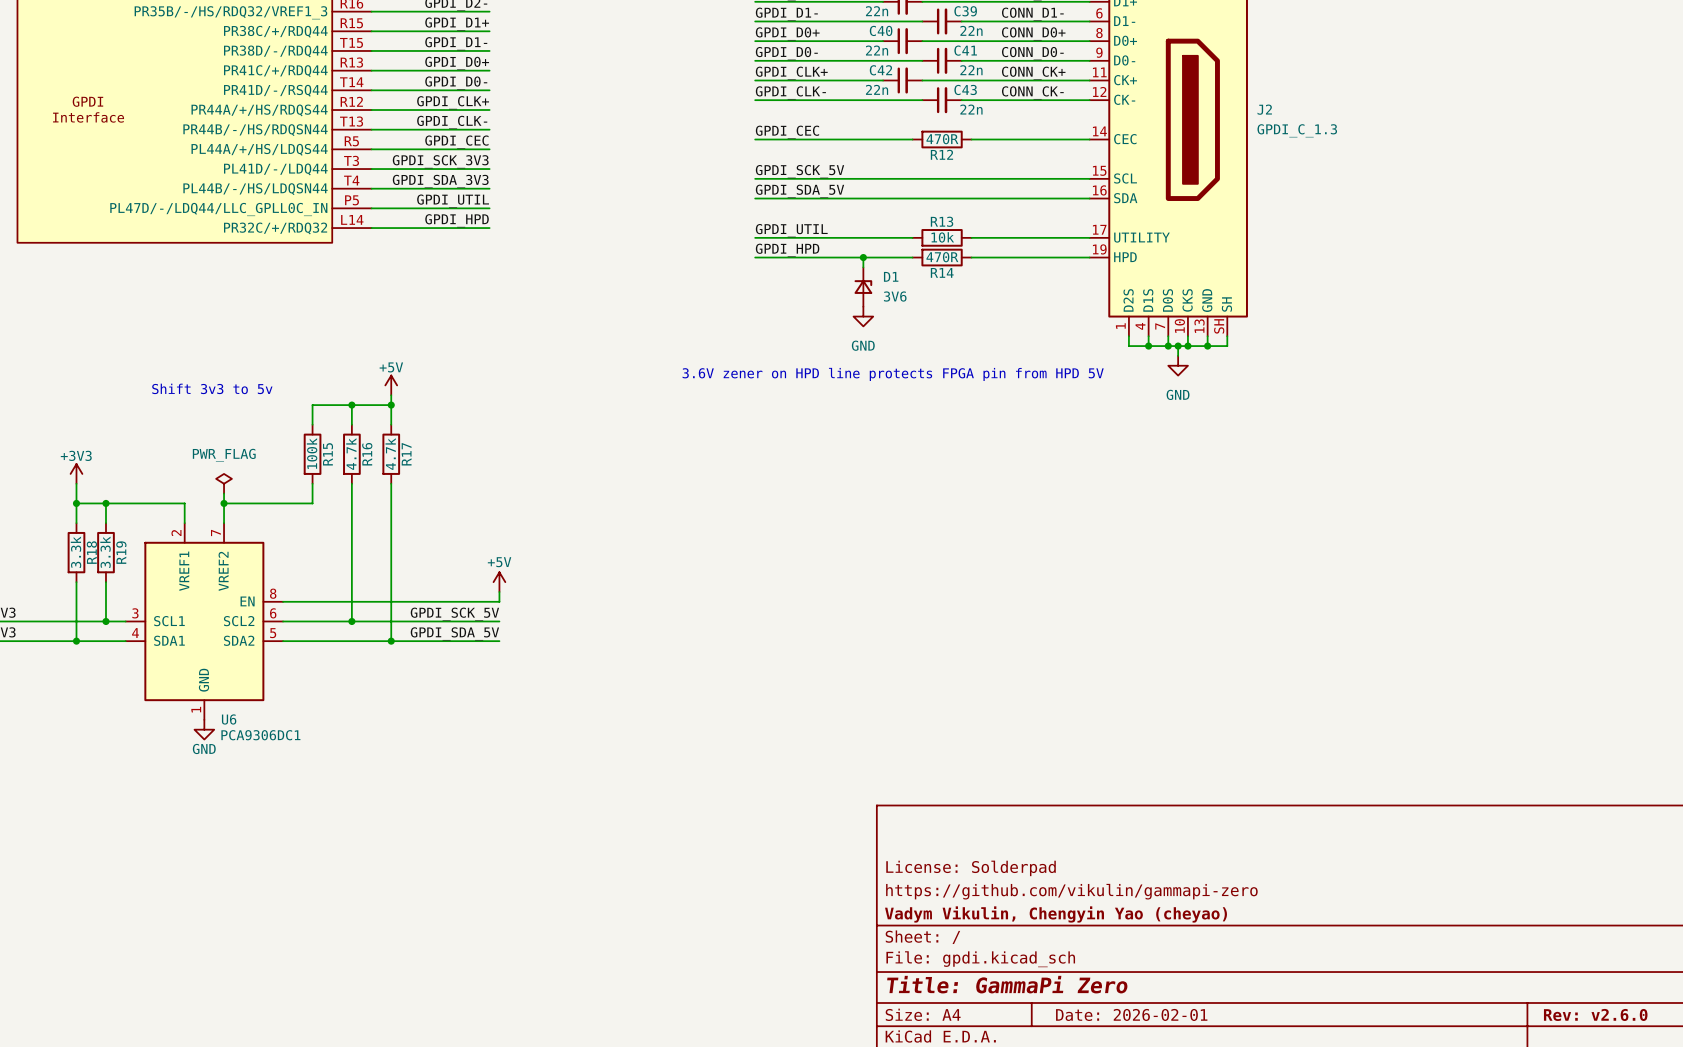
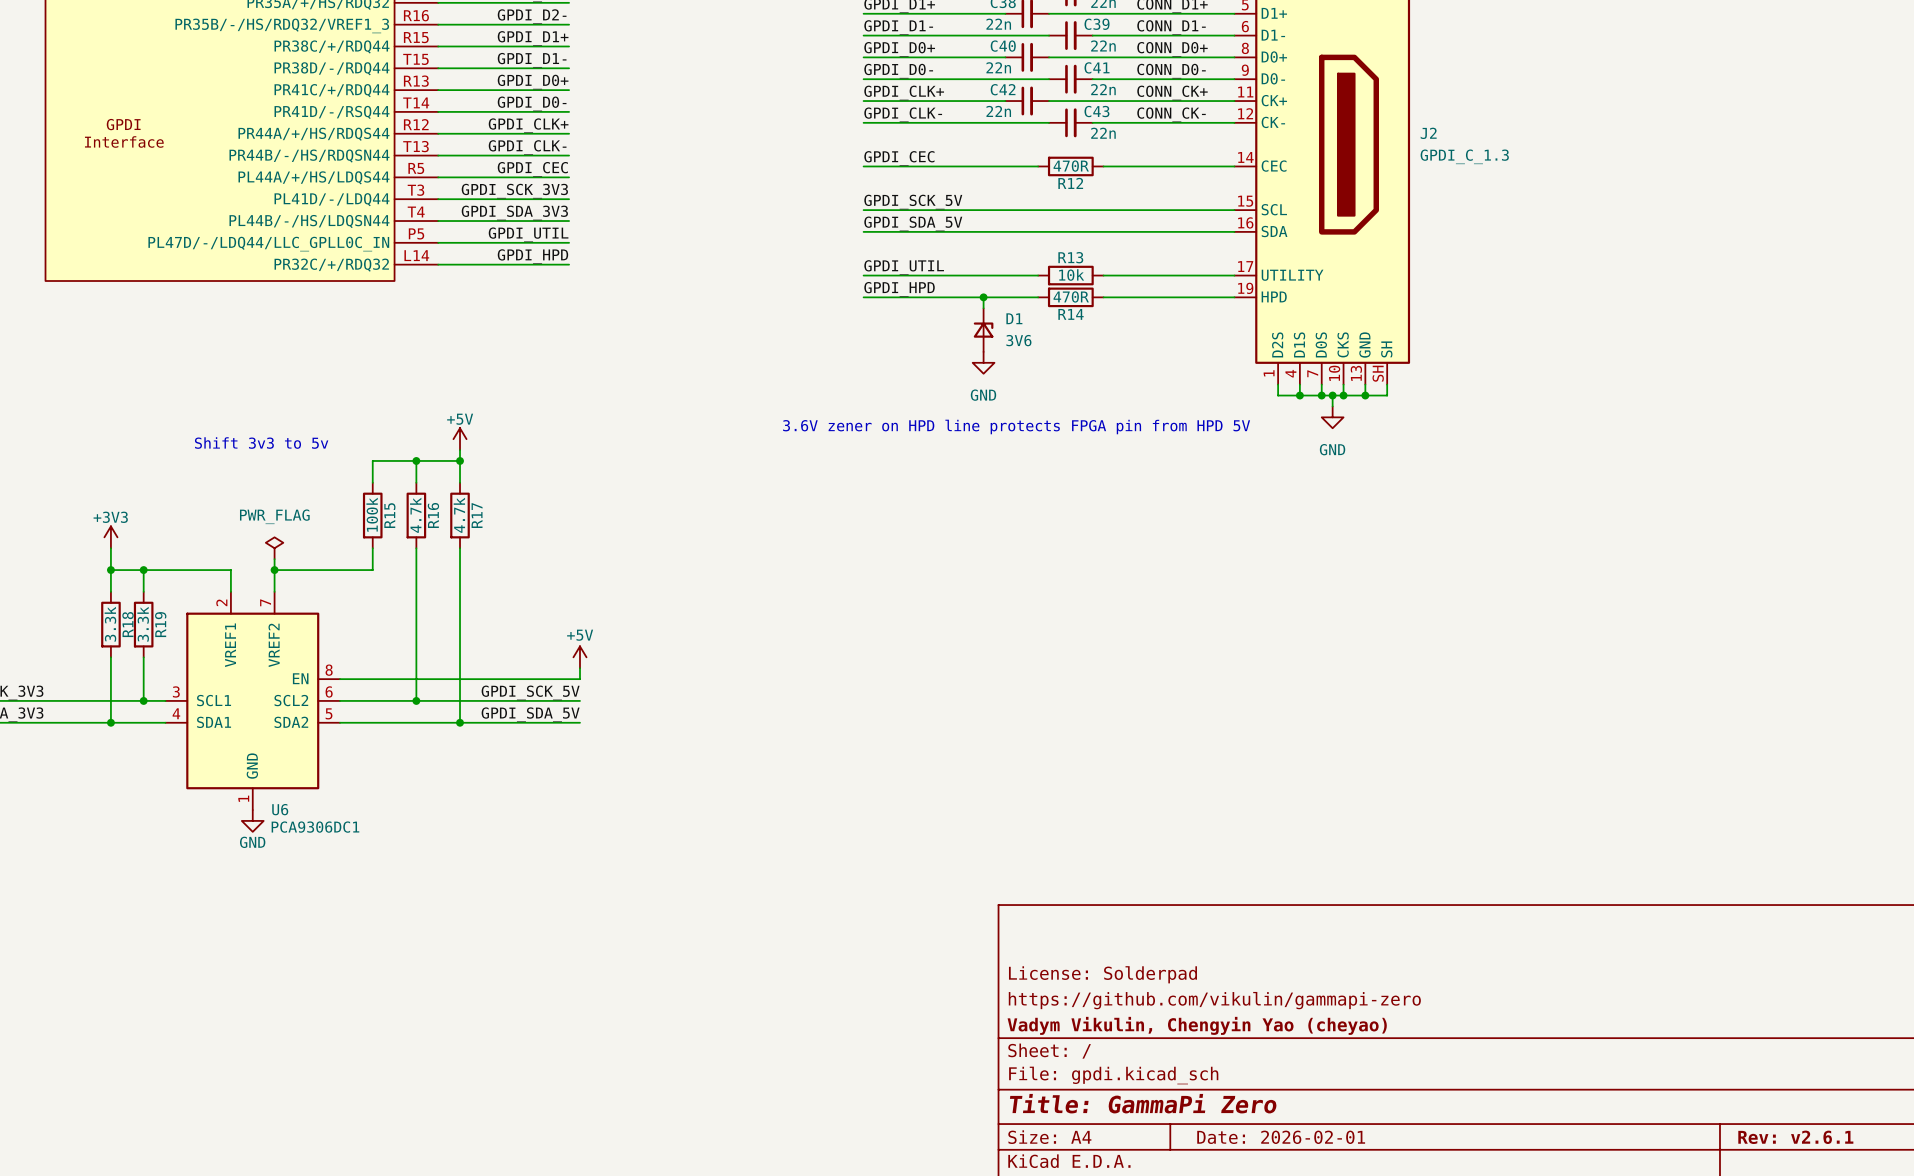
title block: Rev: v2.6.0 (1595, 1014) -> Rev: v2.6.1 (1795, 1137)

